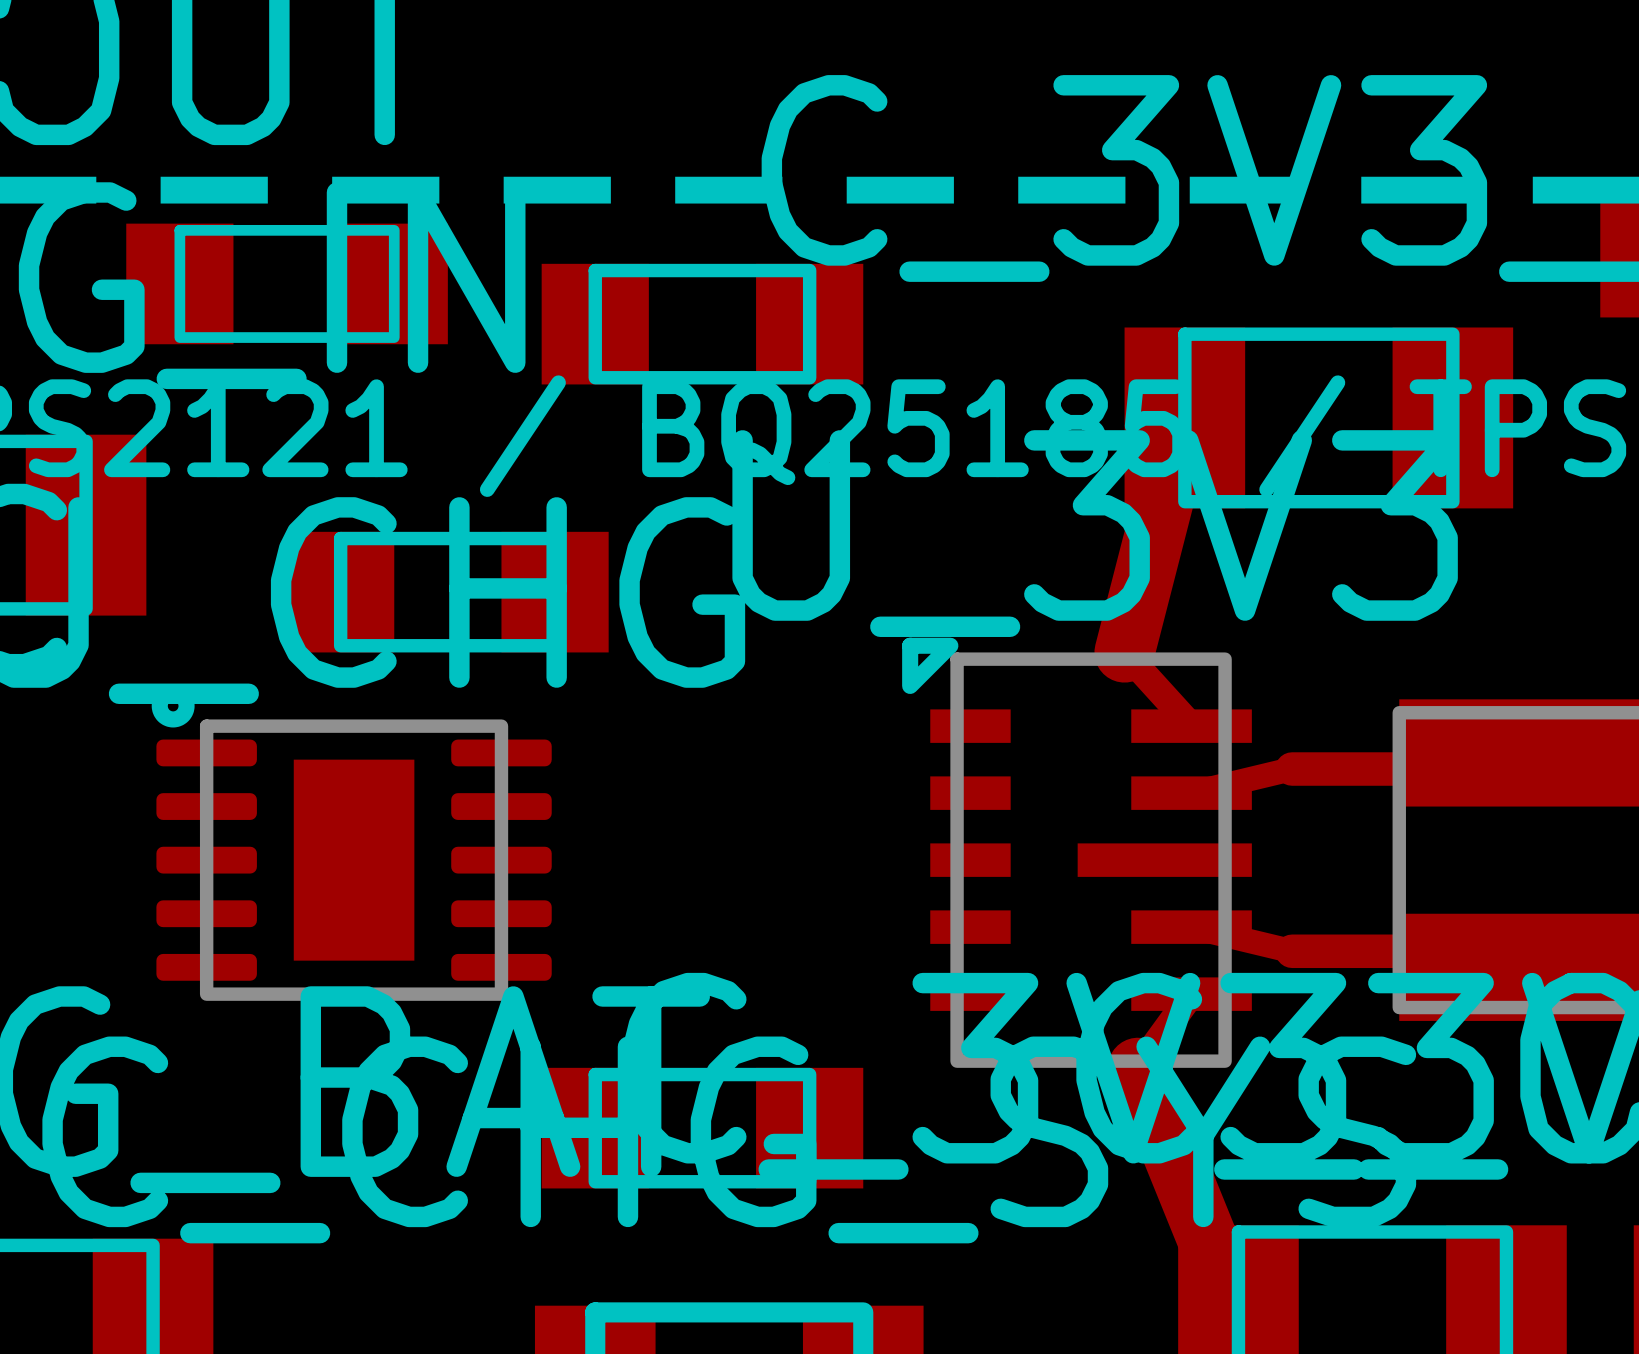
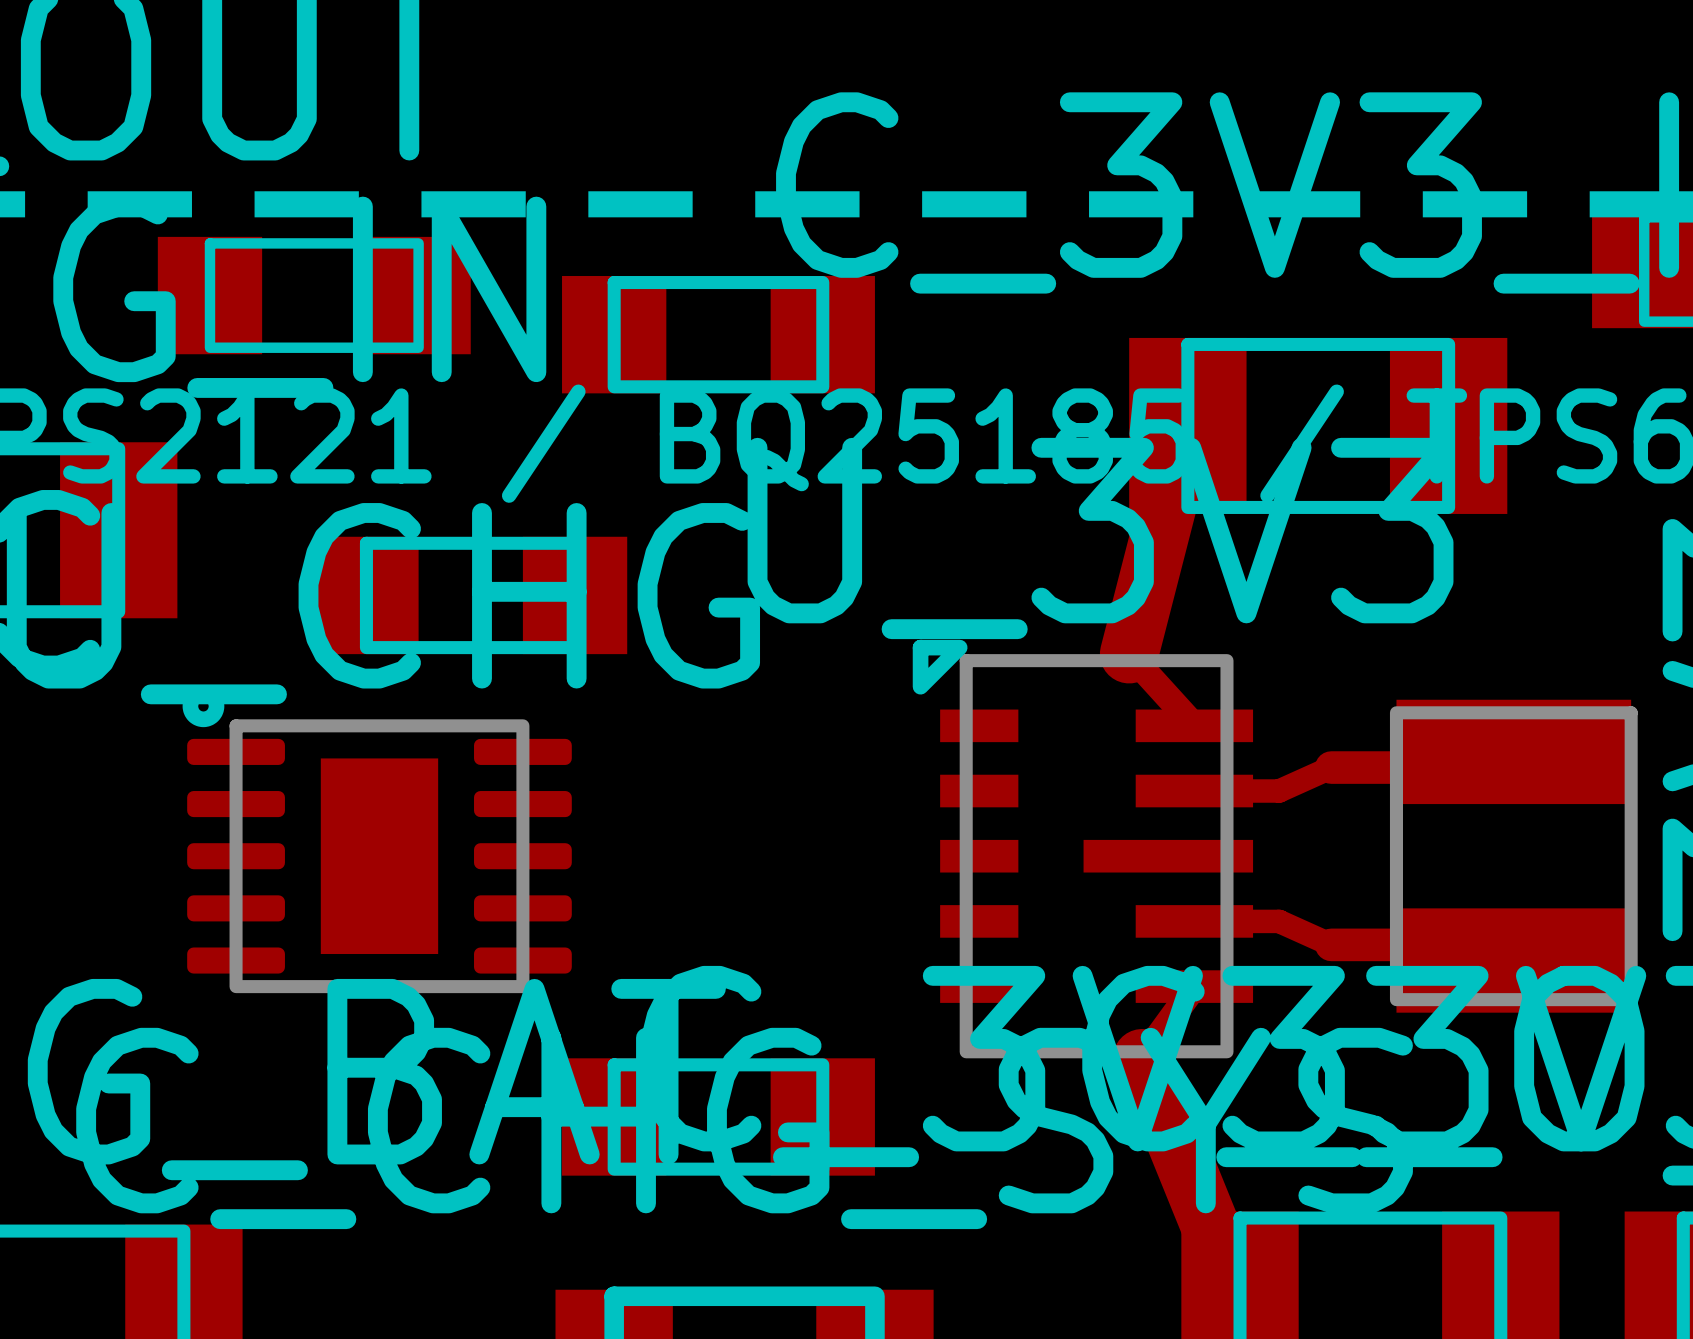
track: (1332, 769) (1292, 769) (1191, 793) -> (1331, 767) (1279, 791) (1194, 791)
track: (1191, 927) (1292, 951) (1332, 951) -> (1194, 921) (1279, 921) (1331, 944)

